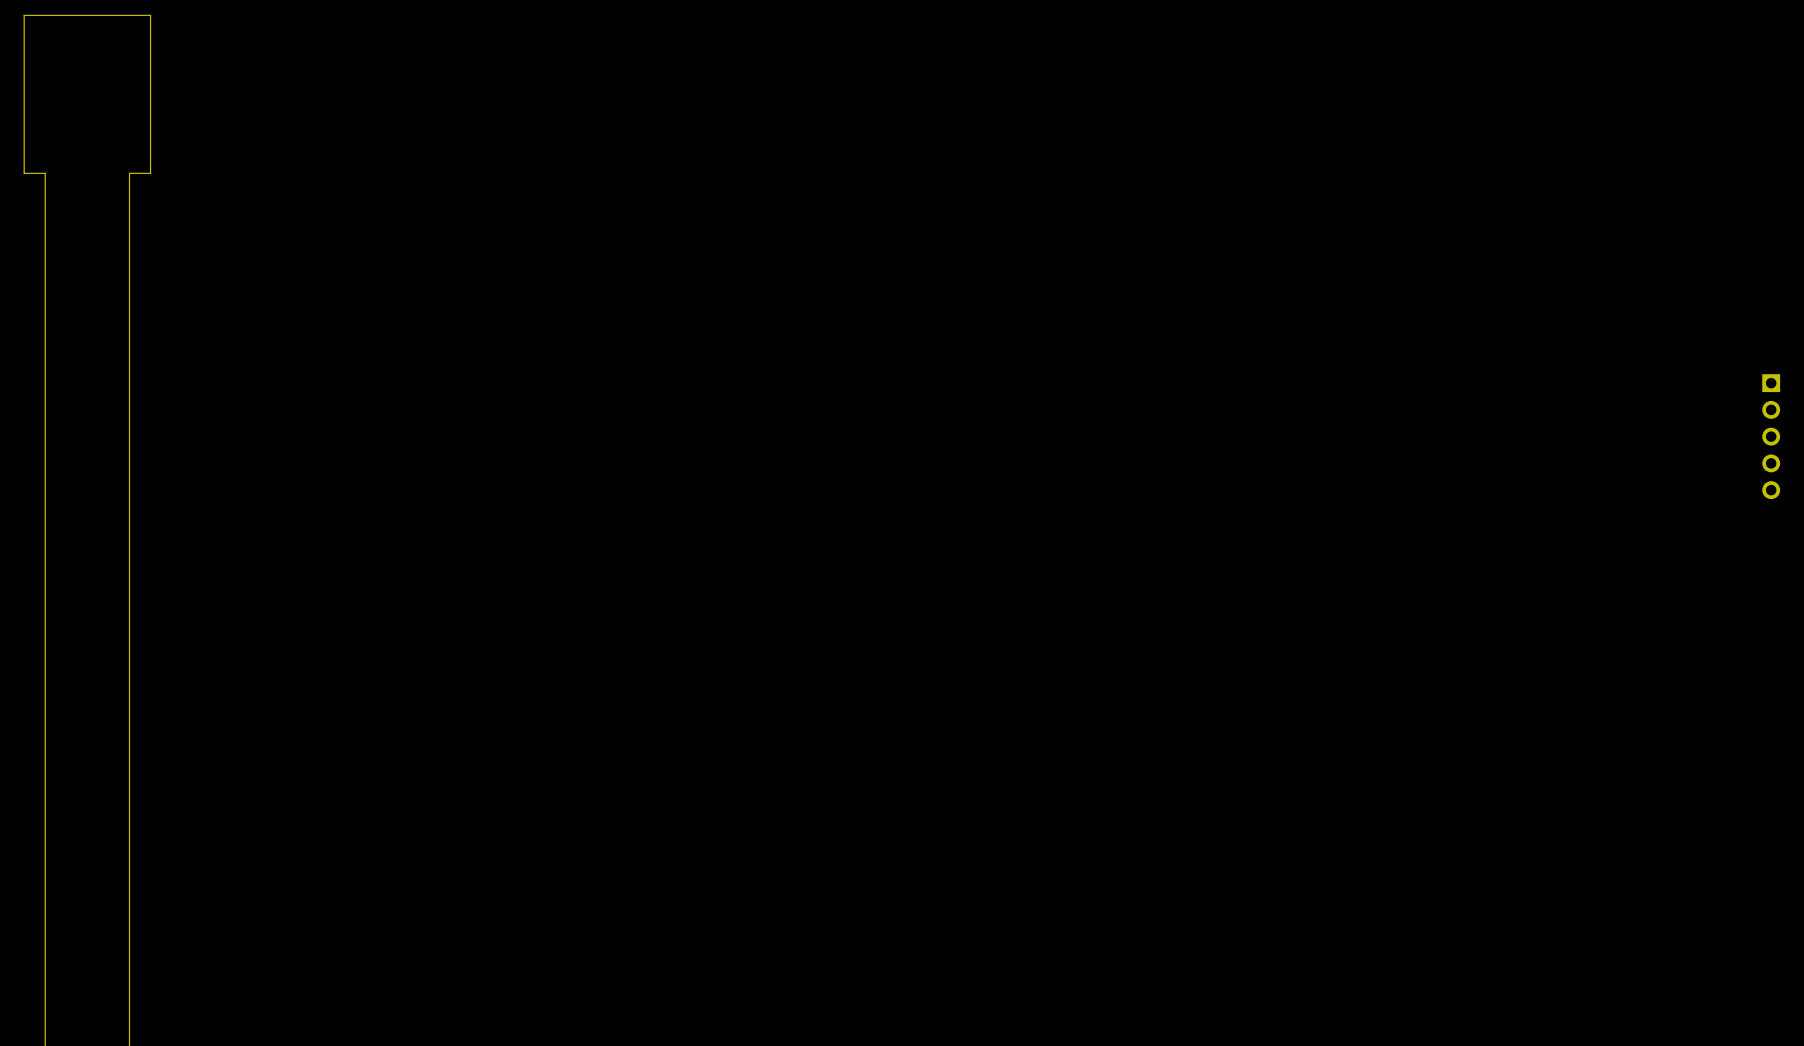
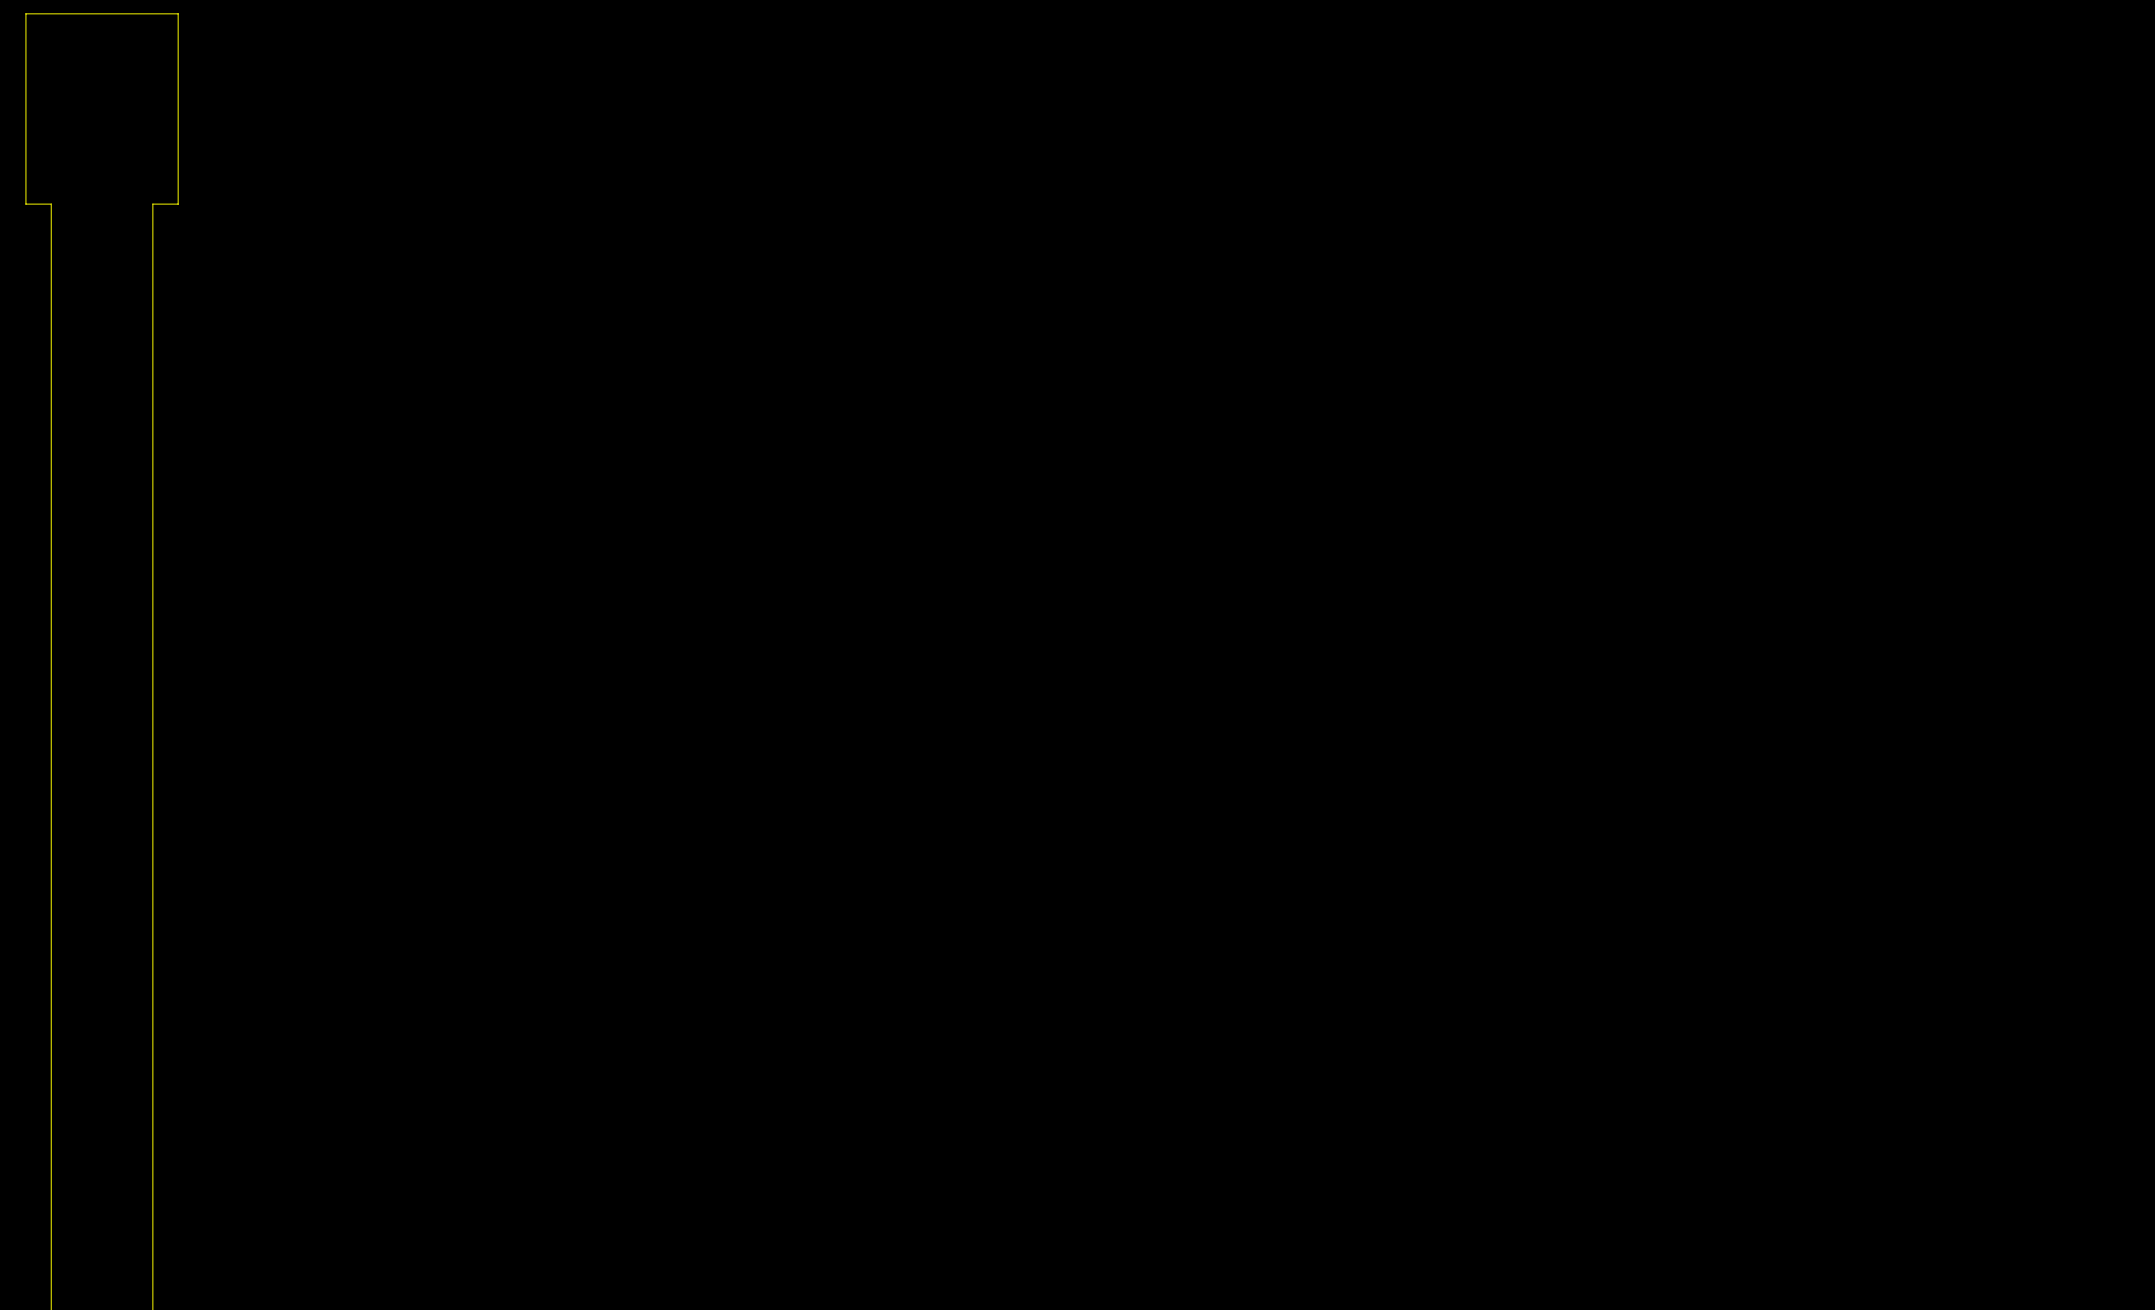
part: (1771, 436) -> none

